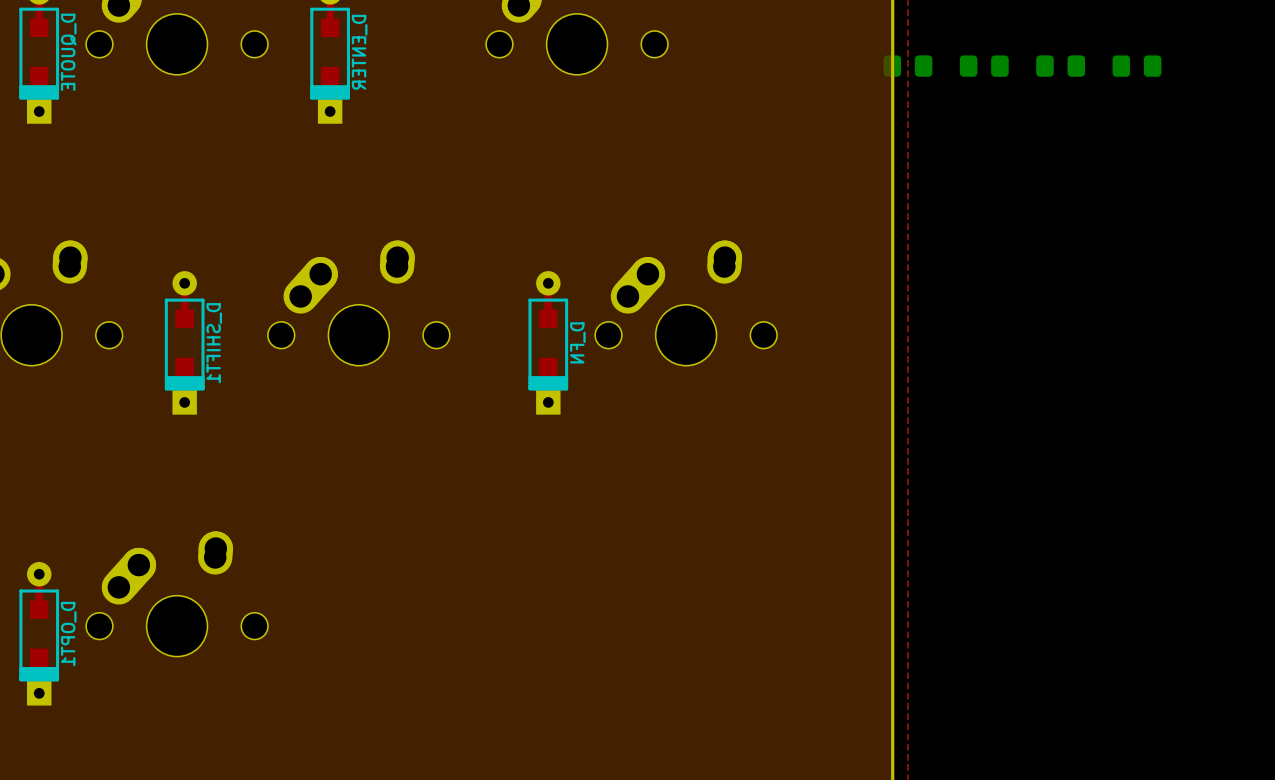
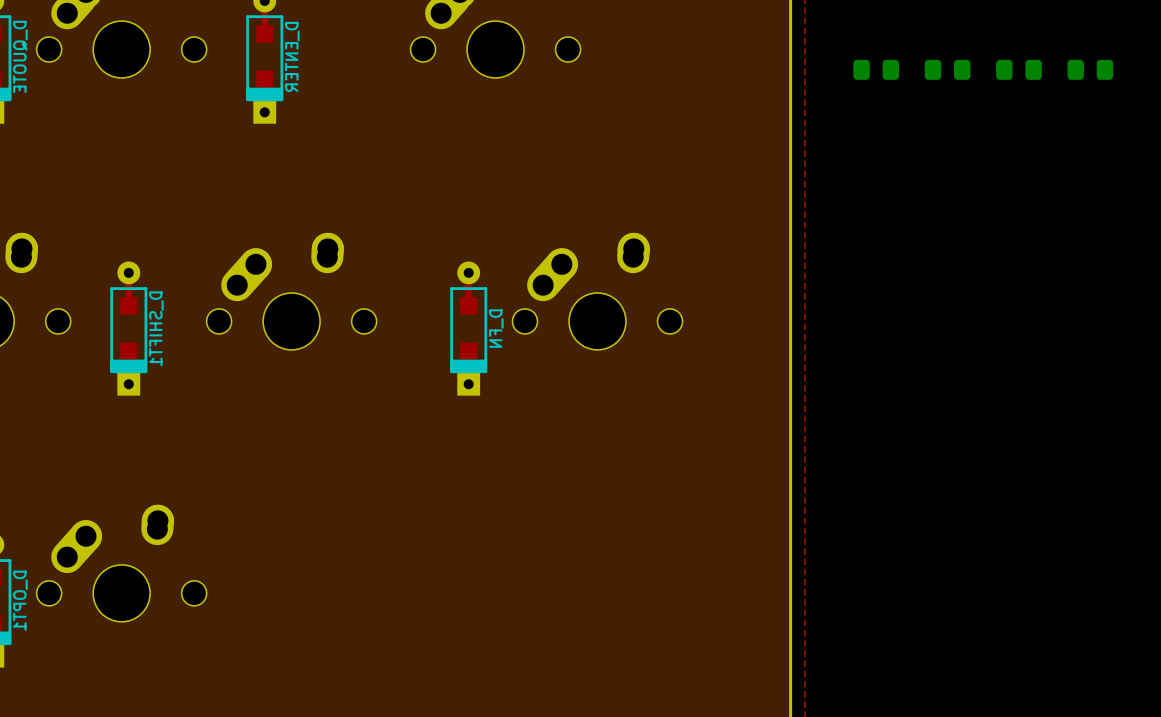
part position: (907, 66) -> (1090, 69)

